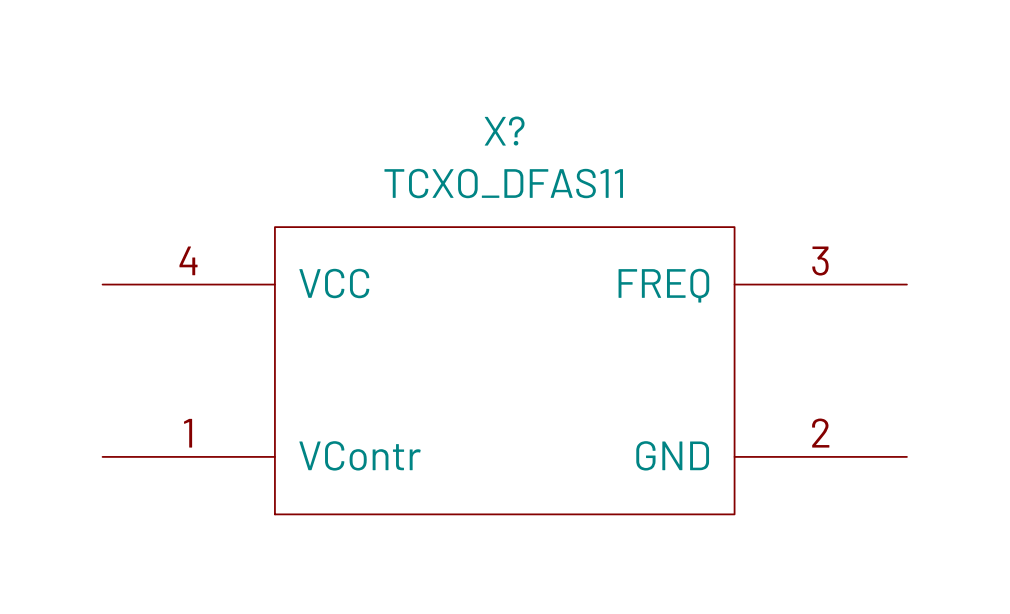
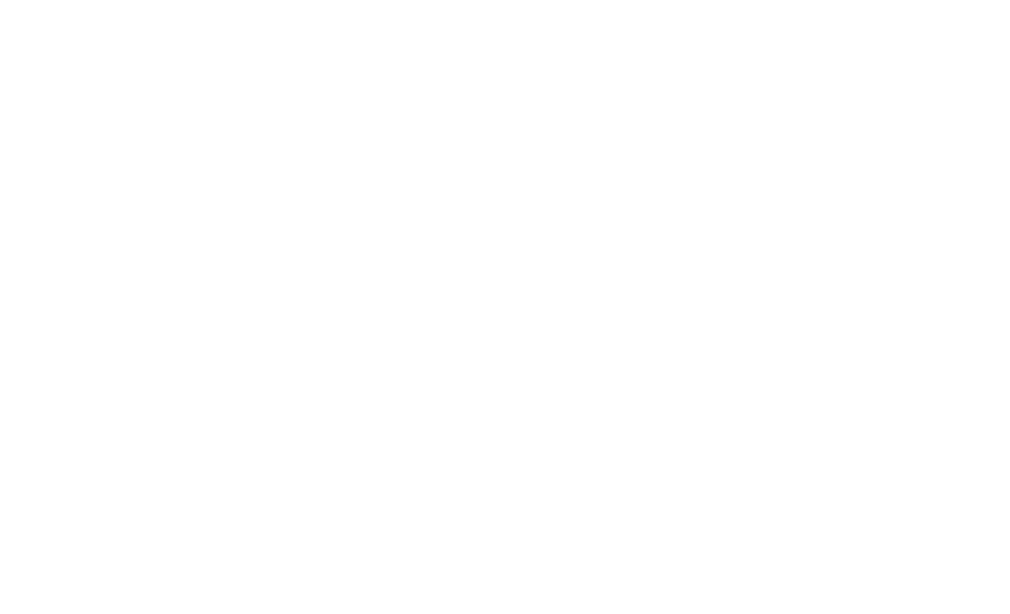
X?: TCXO_DFAS11 (504, 370) -> none

